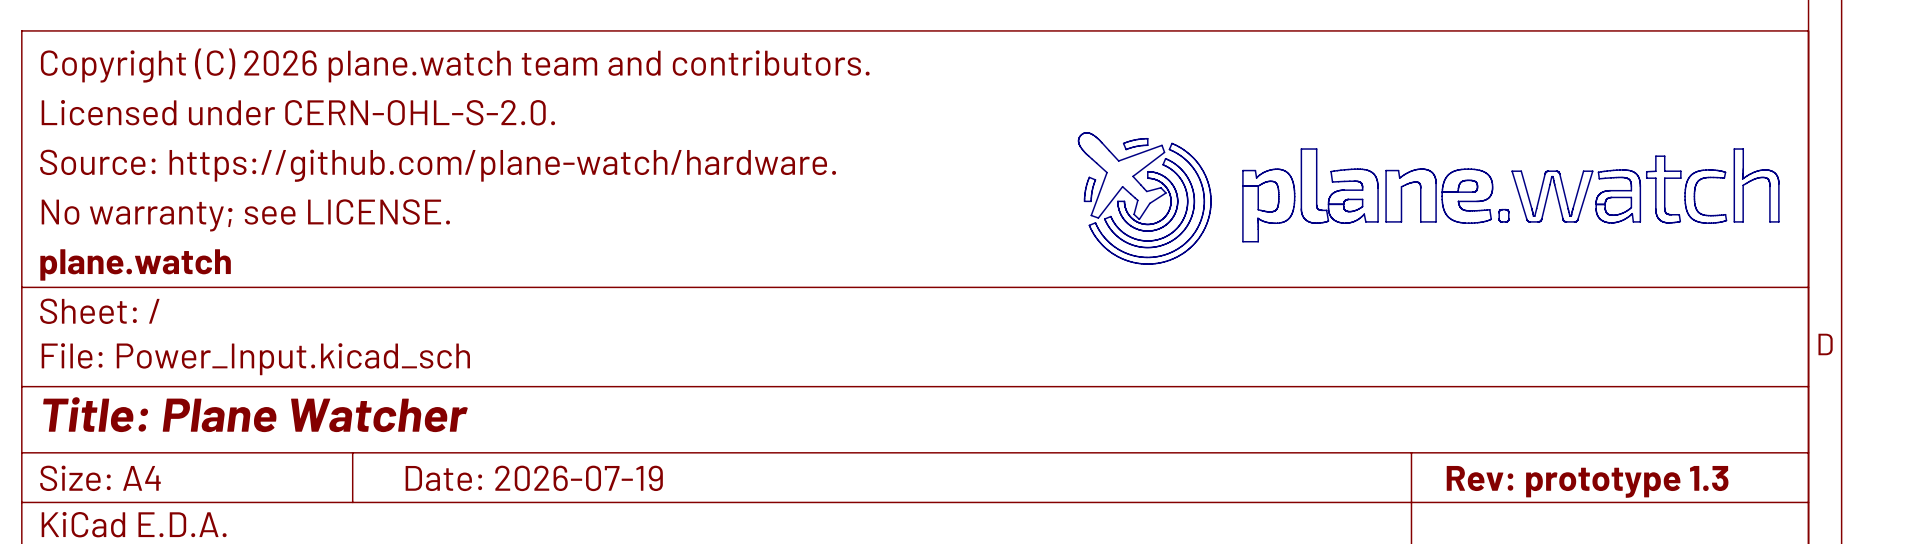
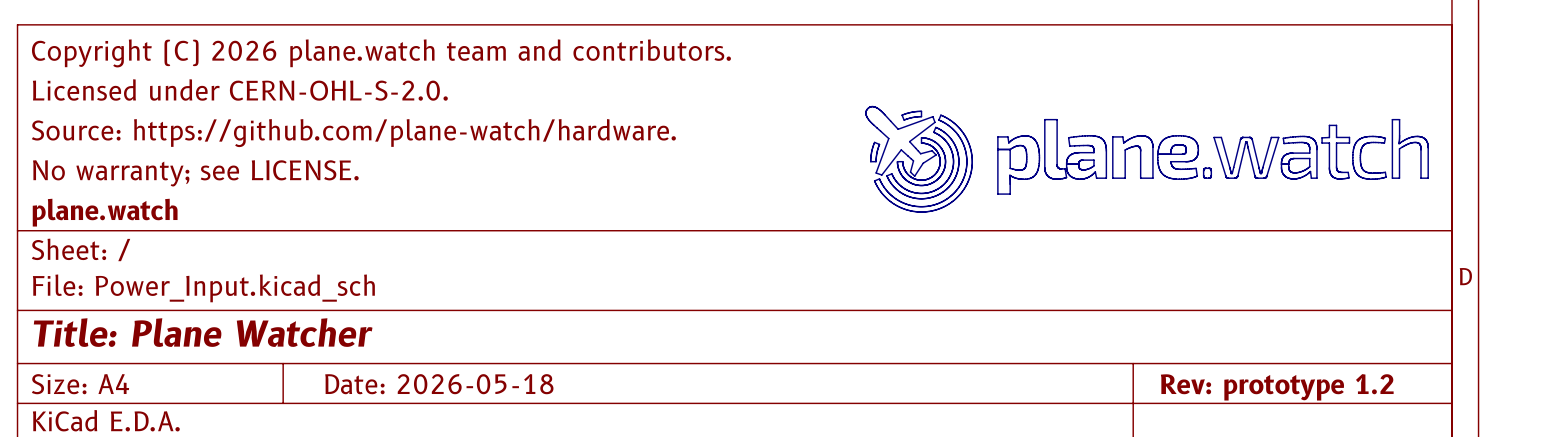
title block: Date: 2026-07-19 (534, 478) -> Date: 2026-05-18 (439, 384)
title block: Rev: prototype 1.3 (1587, 481) -> Rev: prototype 1.2 (1277, 387)

